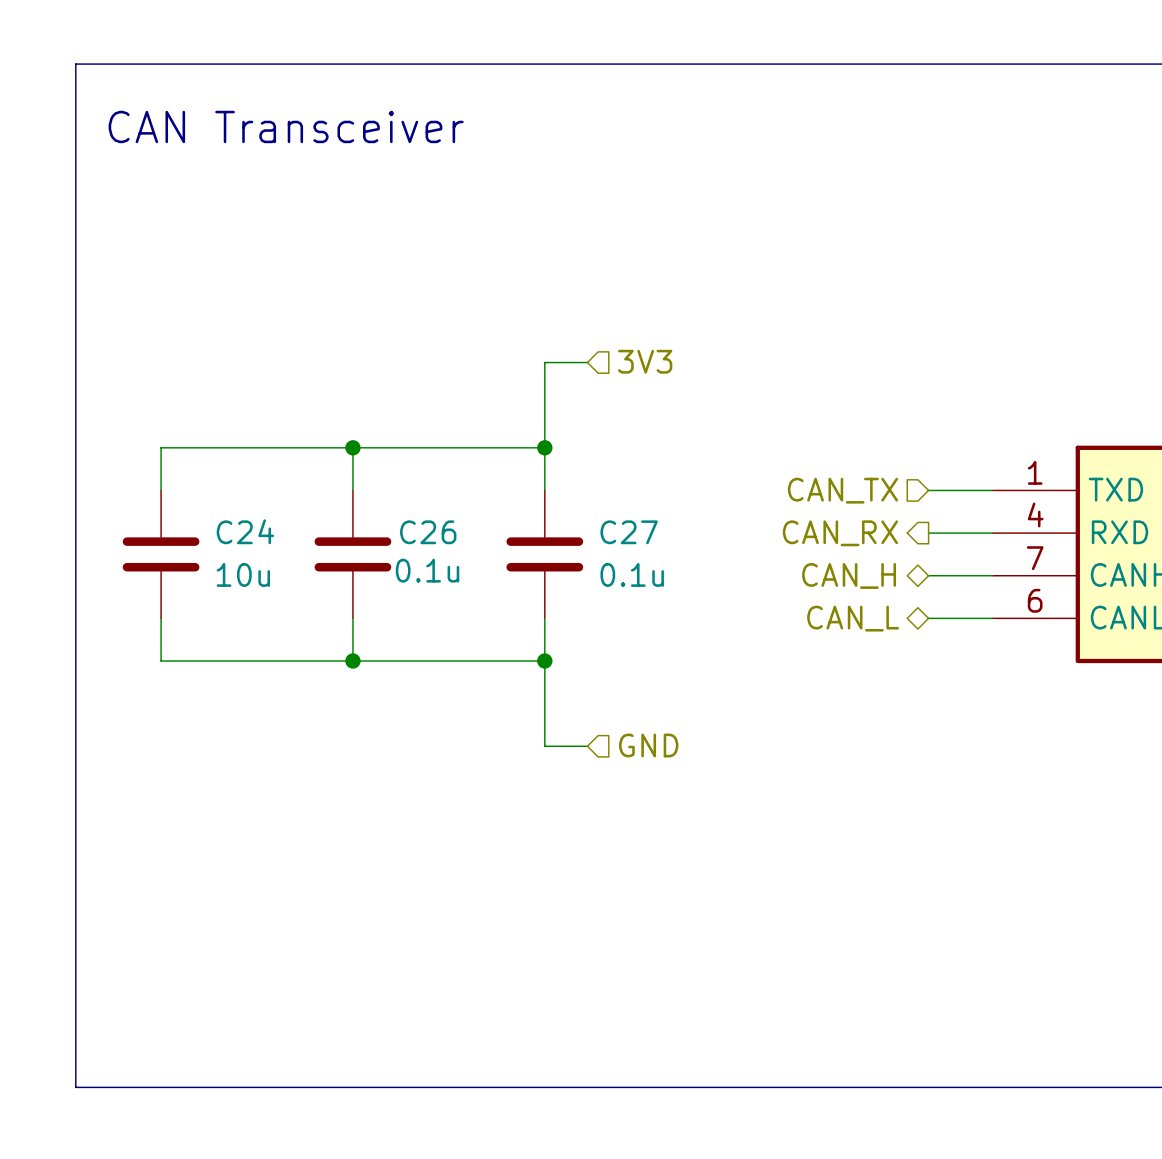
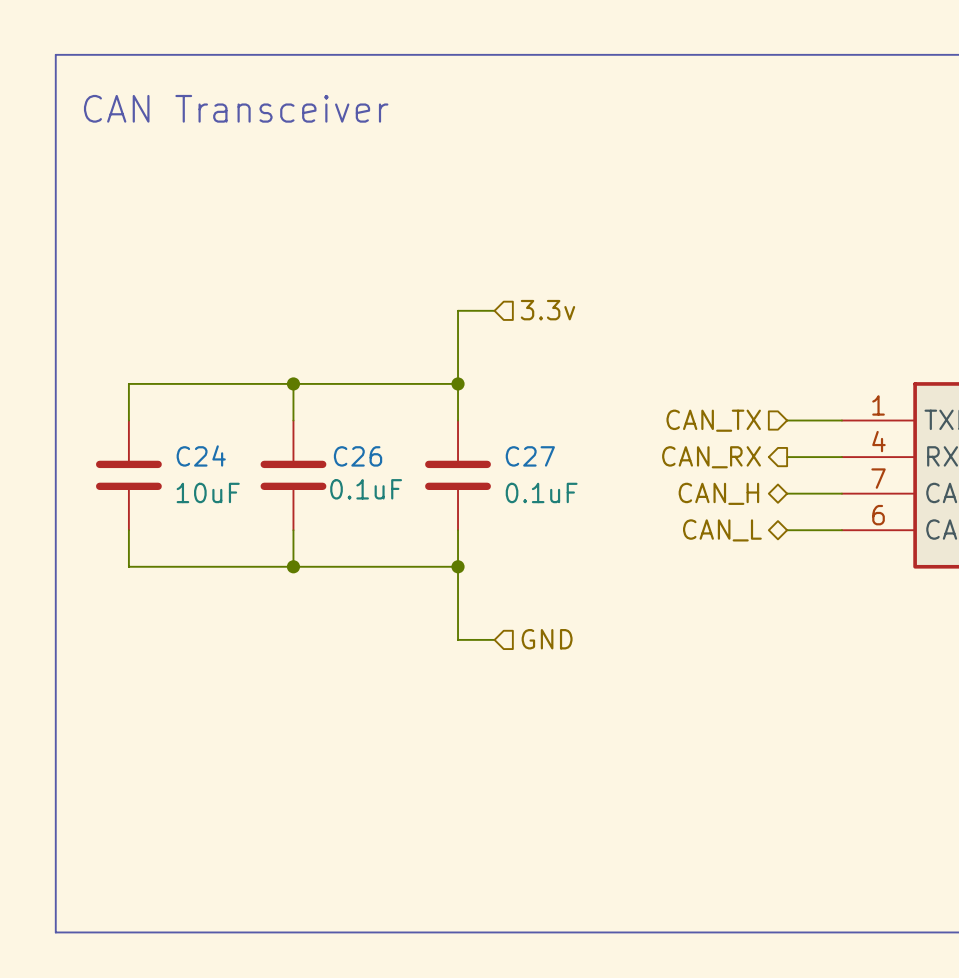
hierarchical label: 3V3 (645, 361) -> 3.3v (547, 310)
C26 value: 0.1u (427, 570) -> 0.1uF (366, 489)
C24 value: 10u (243, 574) -> 10uF (208, 492)
C27 value: 0.1u (632, 574) -> 0.1uF (541, 492)

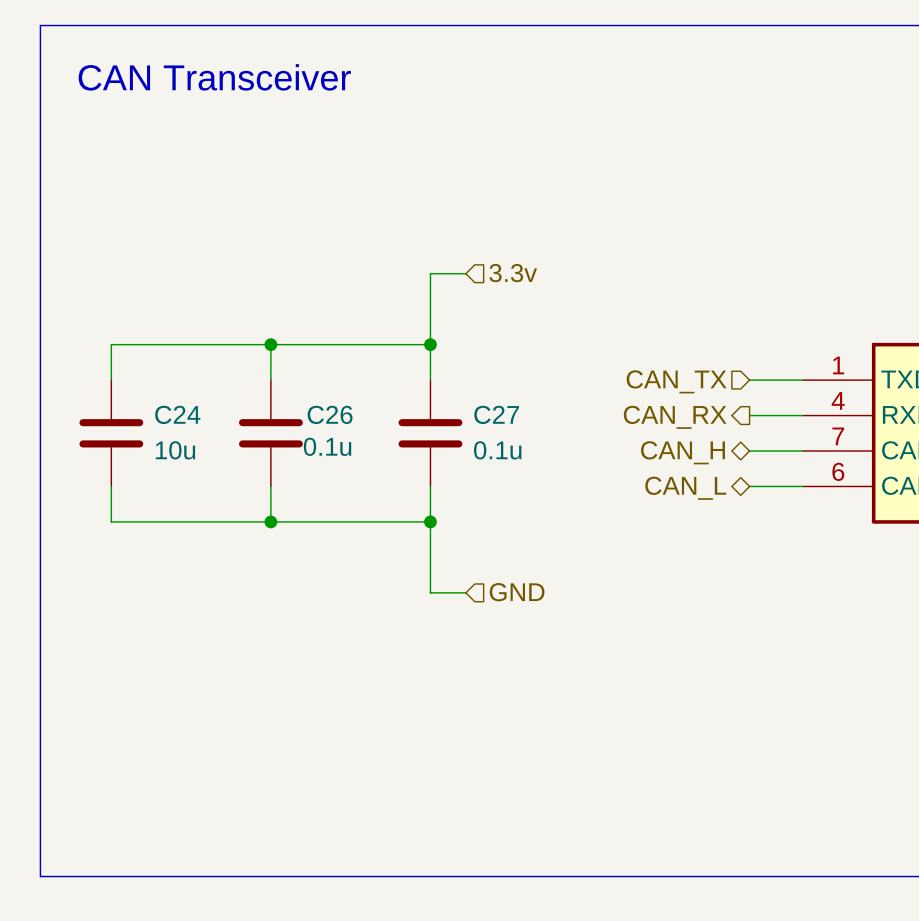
C26 value: 0.1uF (366, 489) -> 0.1u (327, 446)
C24 value: 10uF (208, 492) -> 10u (175, 450)
C27 value: 0.1uF (541, 492) -> 0.1u (497, 450)

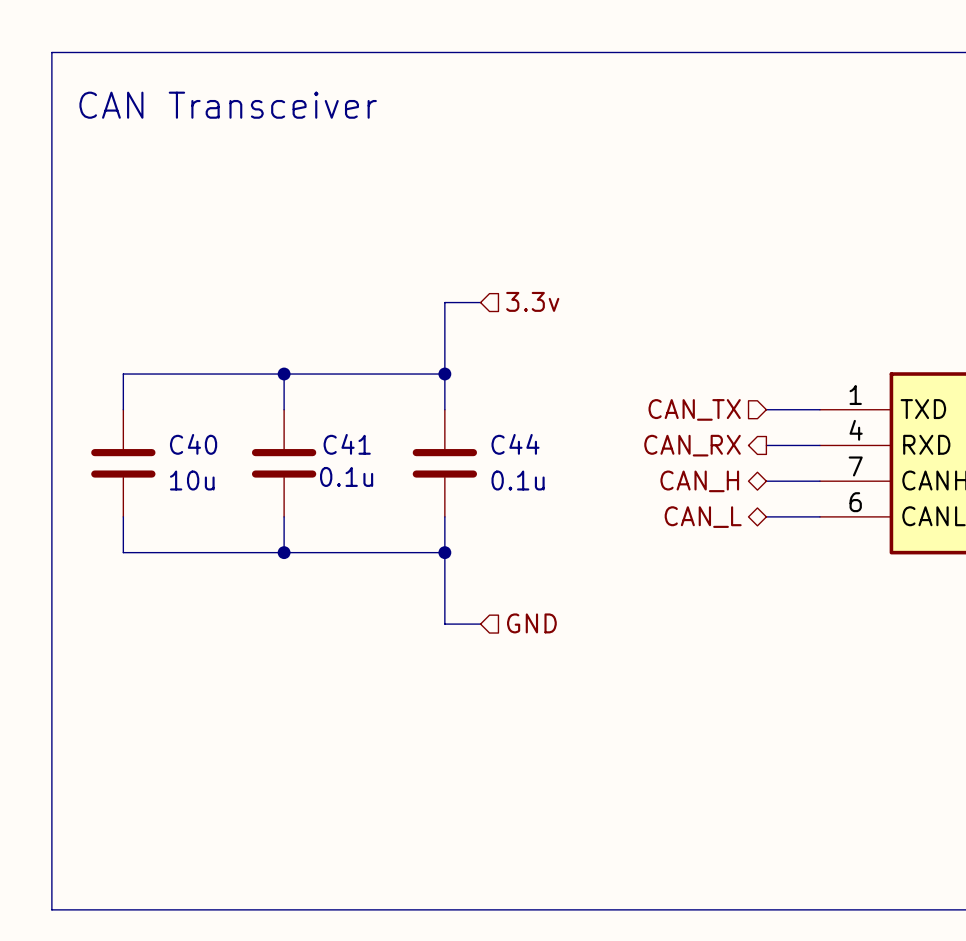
C24 name: C24 (177, 414) -> C40 (193, 444)
C26 name: C26 (330, 414) -> C41 (347, 444)
C27 name: C27 (496, 414) -> C44 (515, 444)

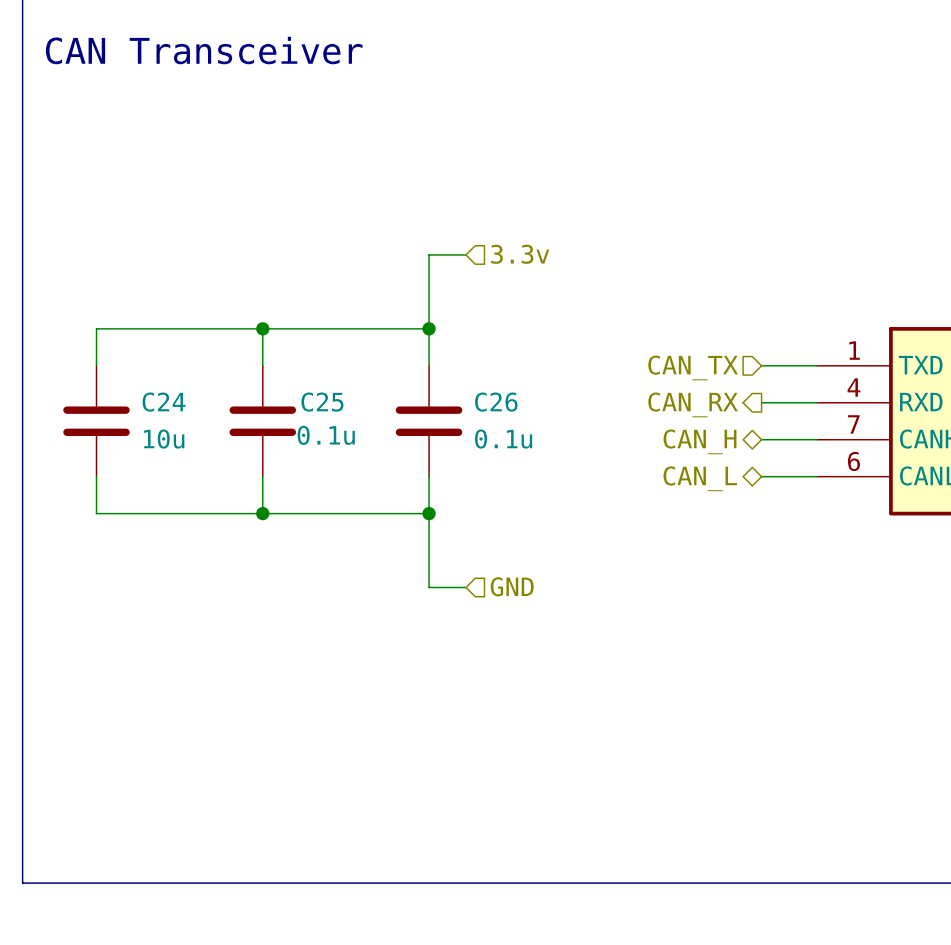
C40 name: C40 (193, 444) -> C24 (163, 402)
C41 name: C41 (347, 444) -> C25 (322, 402)
C44 name: C44 (515, 444) -> C26 (496, 402)

